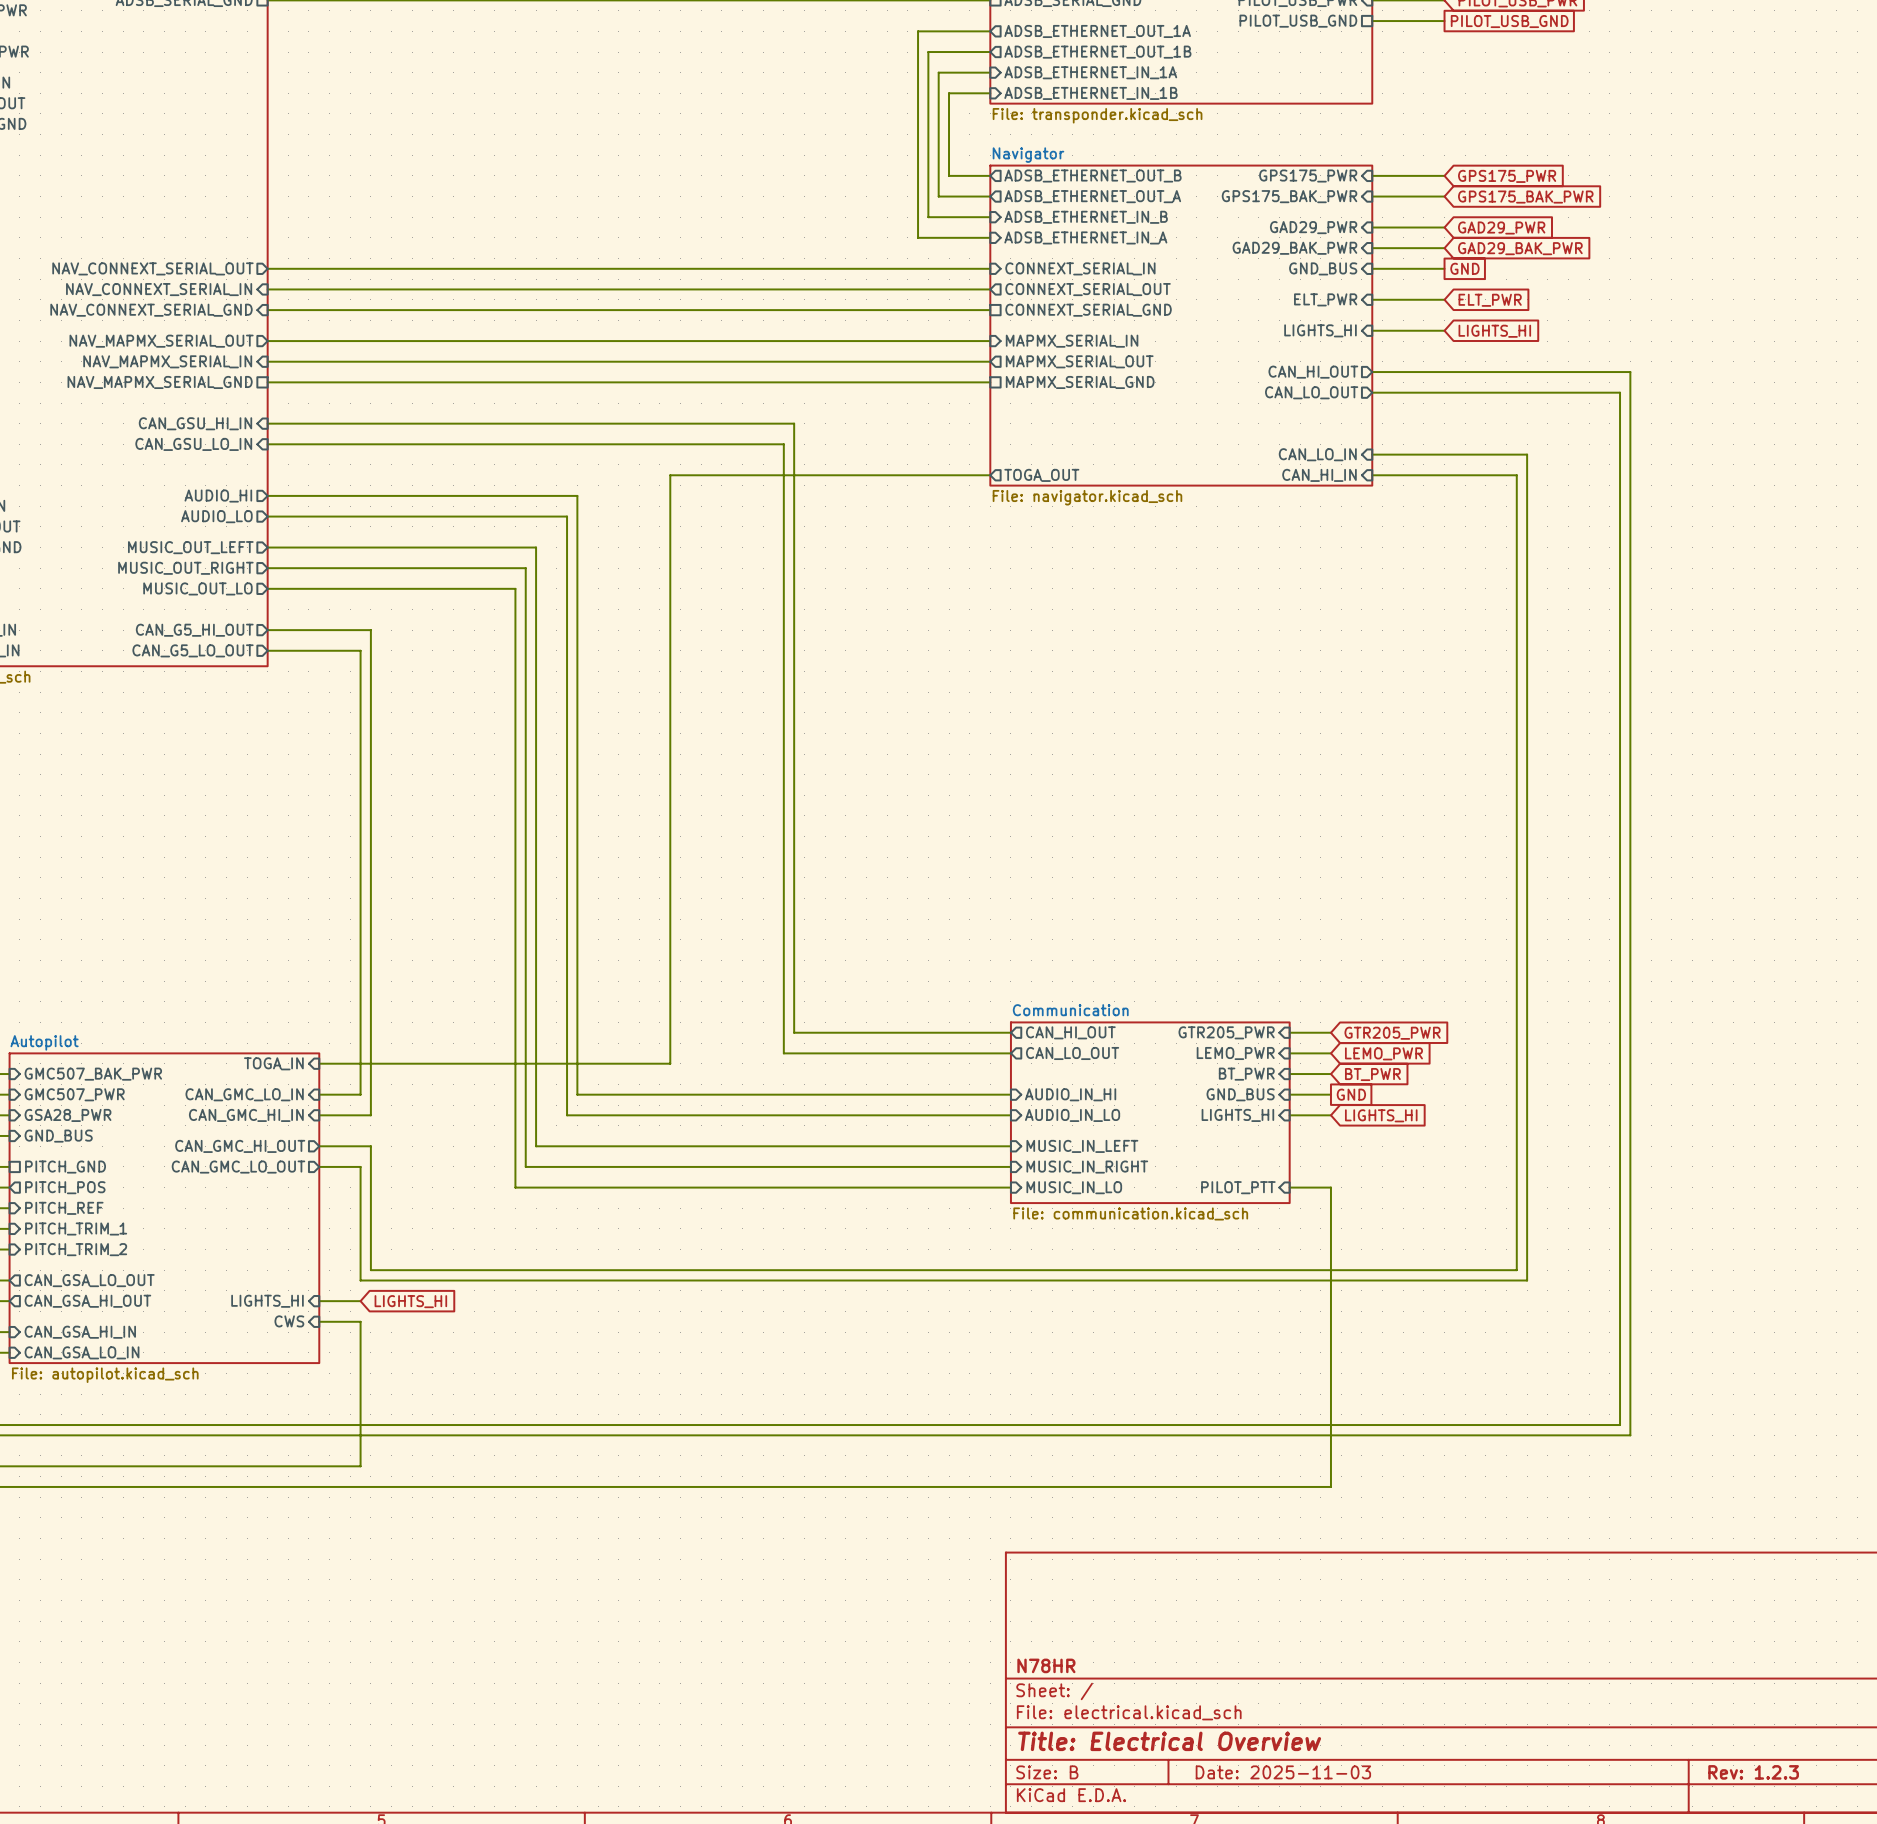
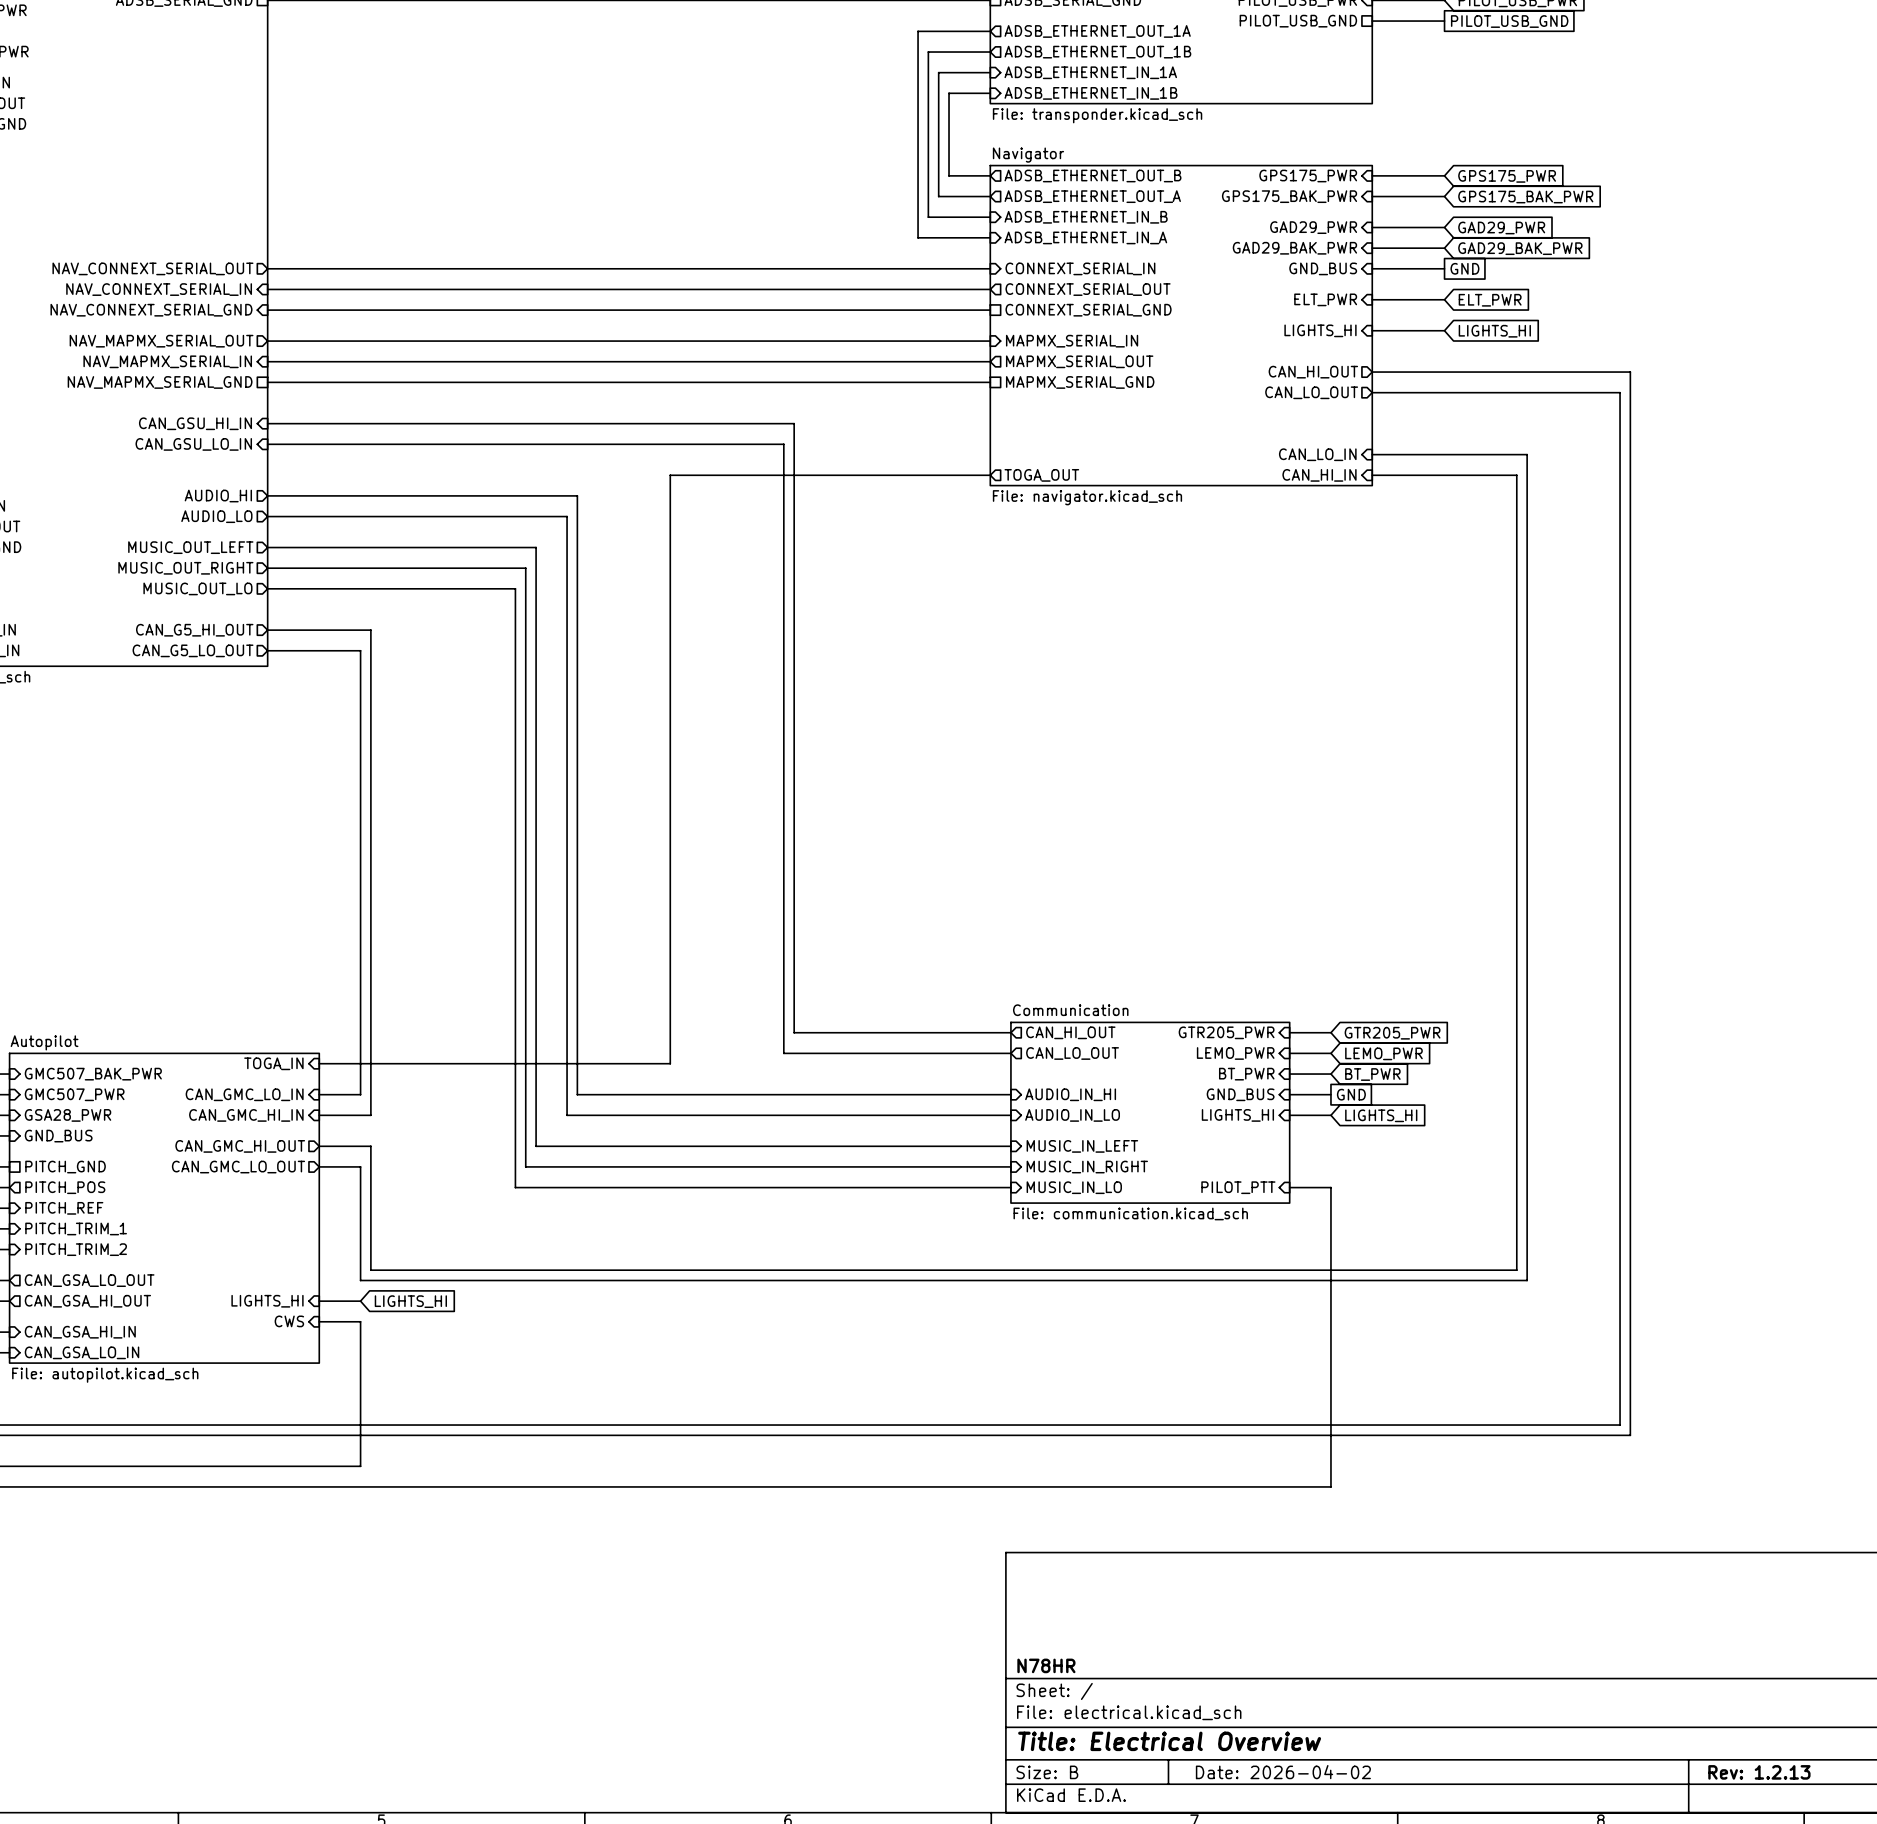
title block: Date: 2025-11-03 (1283, 1772) -> Date: 2026-04-02 (1283, 1772)
title block: Rev: 1.2.3 (1753, 1772) -> Rev: 1.2.13 (1759, 1772)

